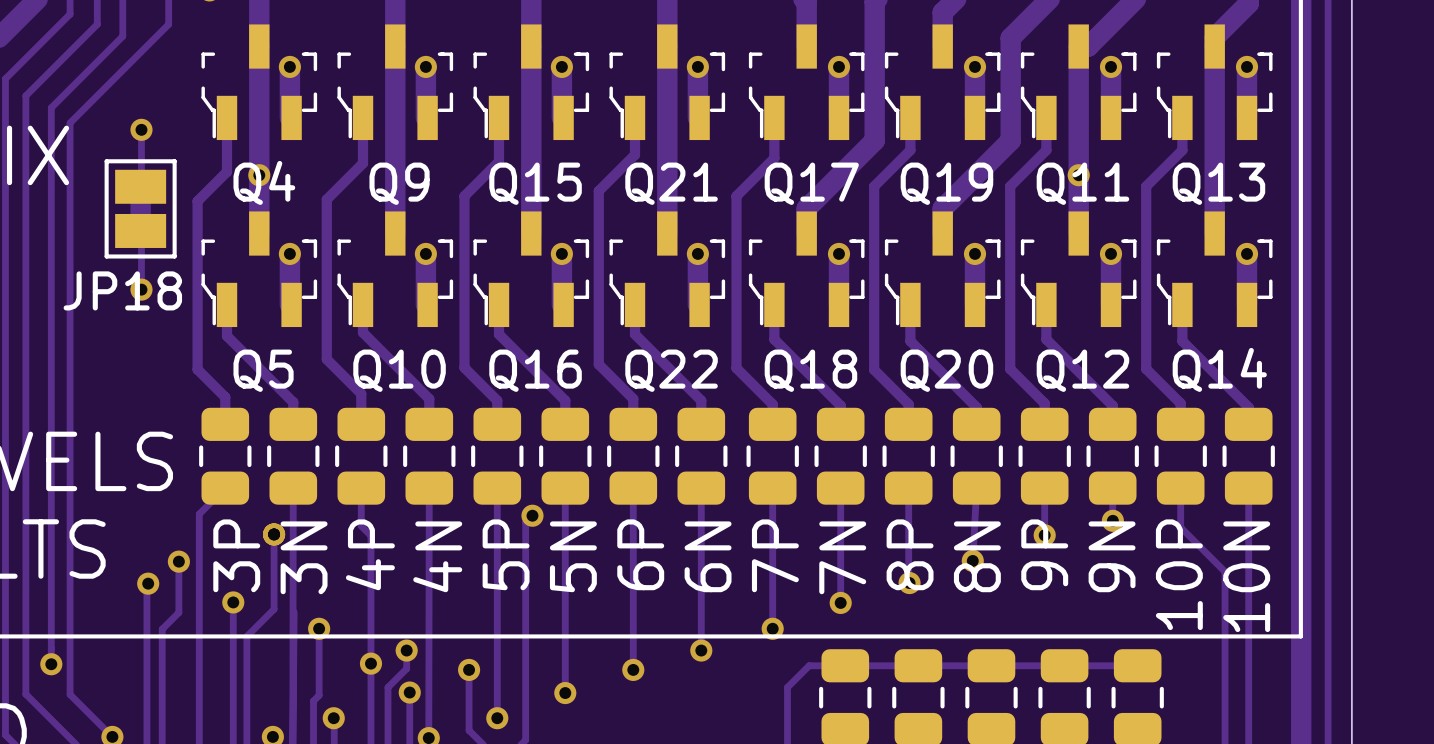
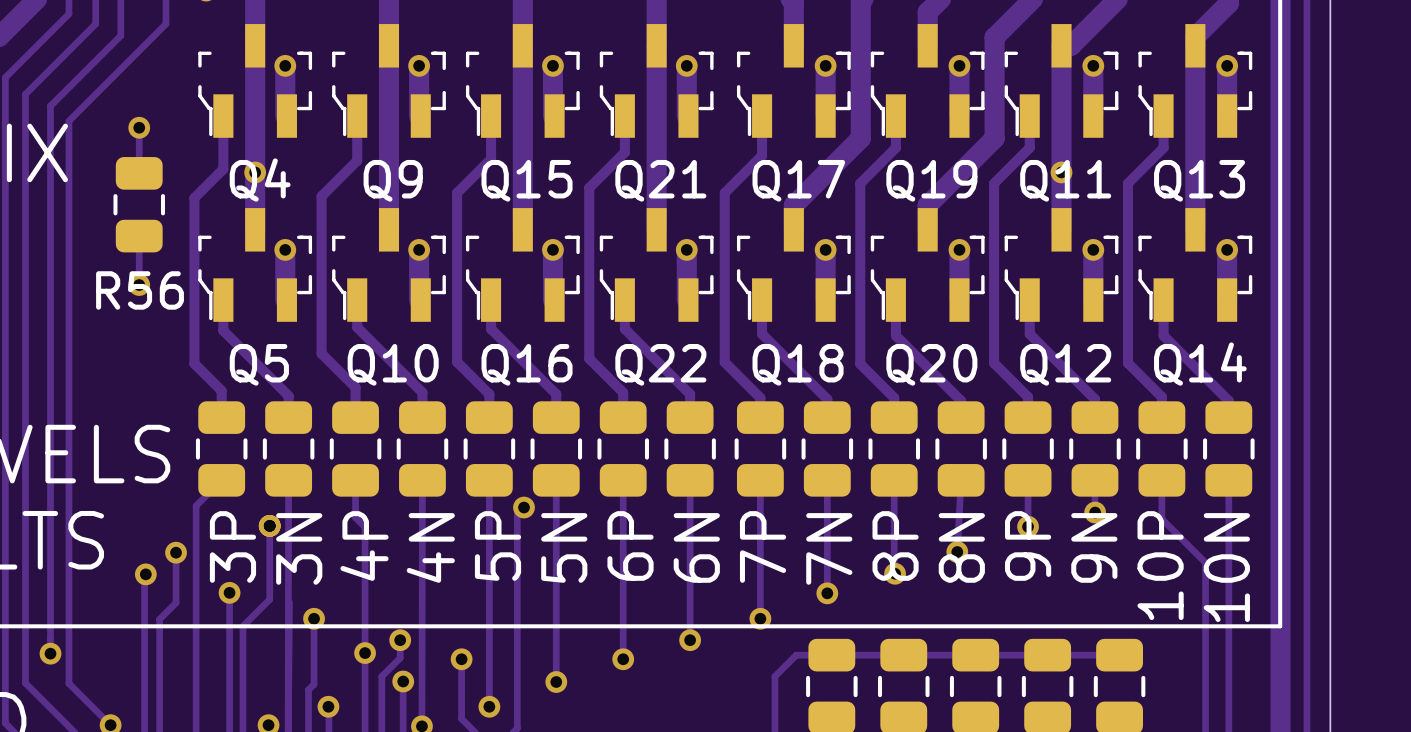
JP18: (140, 208) -> none
R56: none -> (139, 204)

